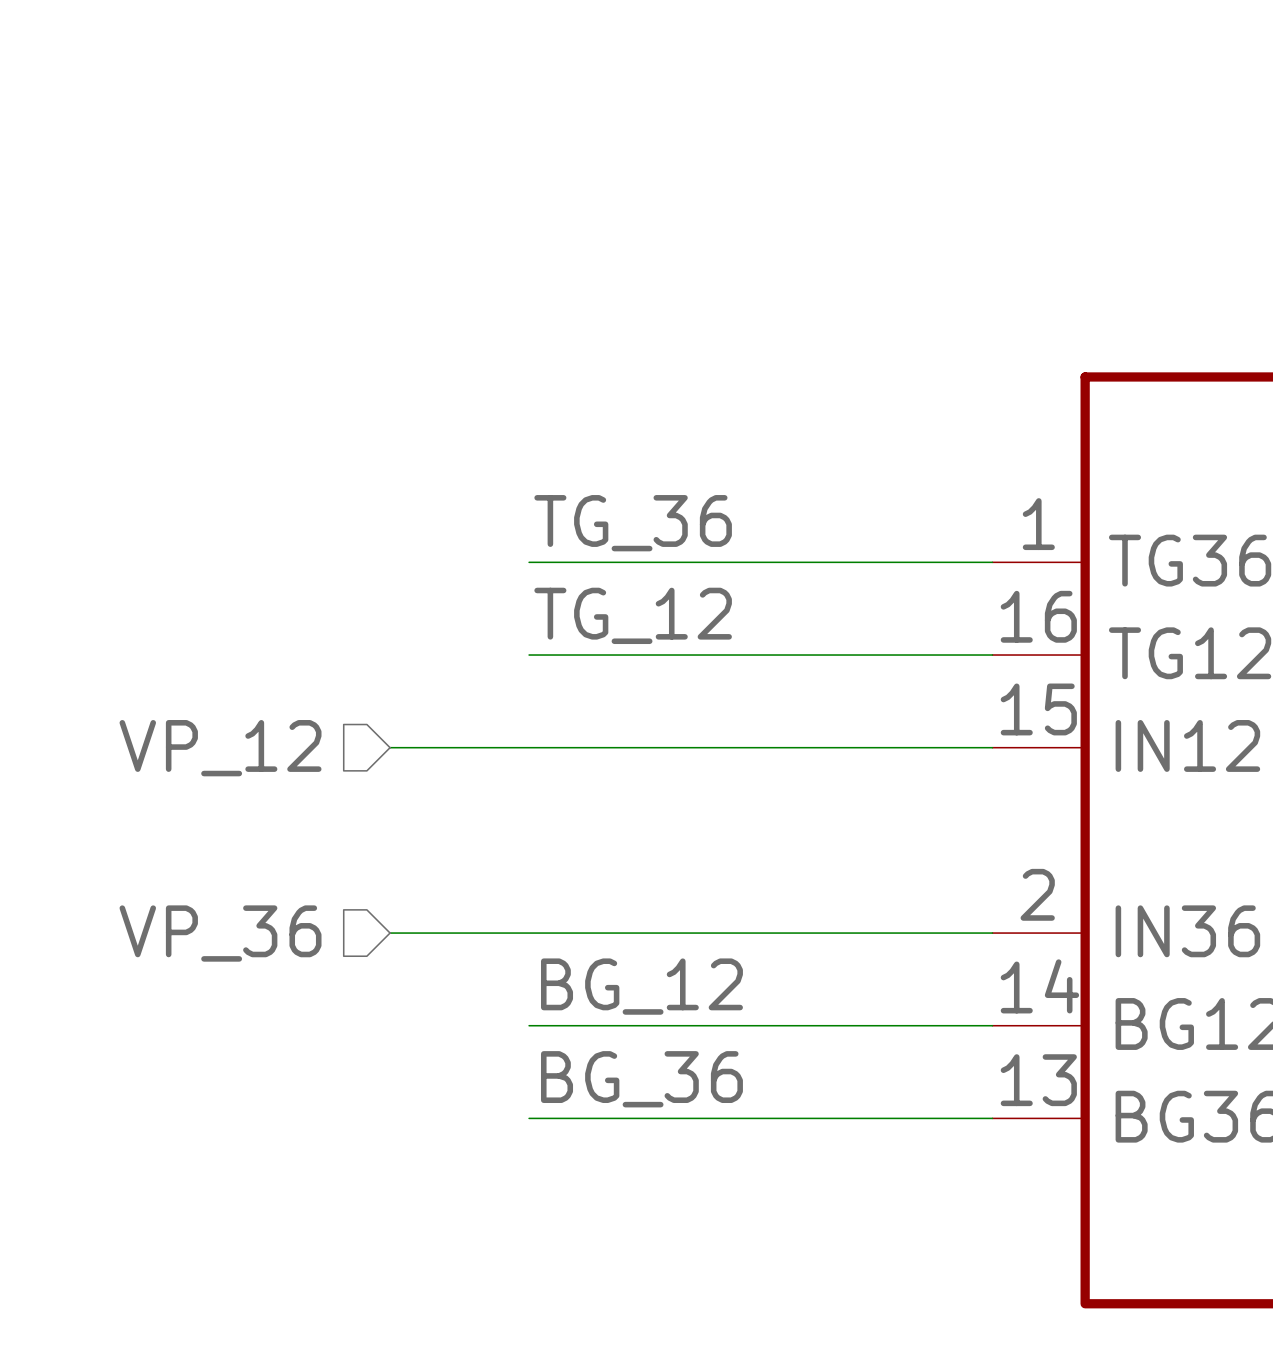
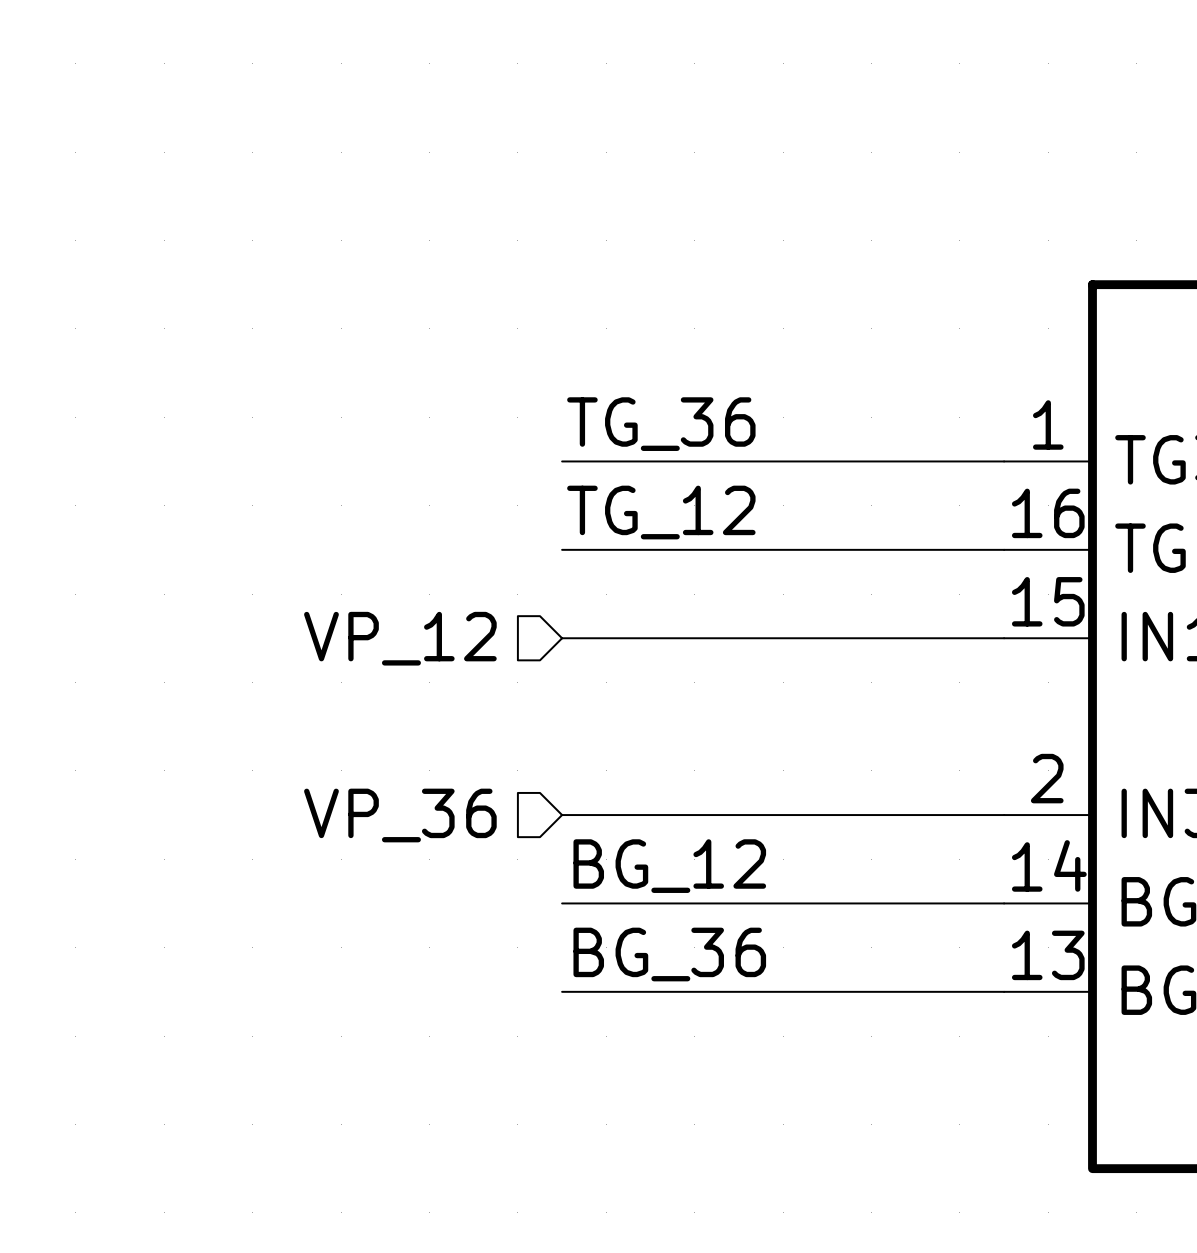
wire: (390, 747) (529, 747) -> none
hierarchical label position: VP_12 (220, 748) -> VP_12 (400, 638)
hierarchical label position: VP_36 (220, 933) -> VP_36 (400, 815)
wire: (390, 933) (529, 933) -> none

